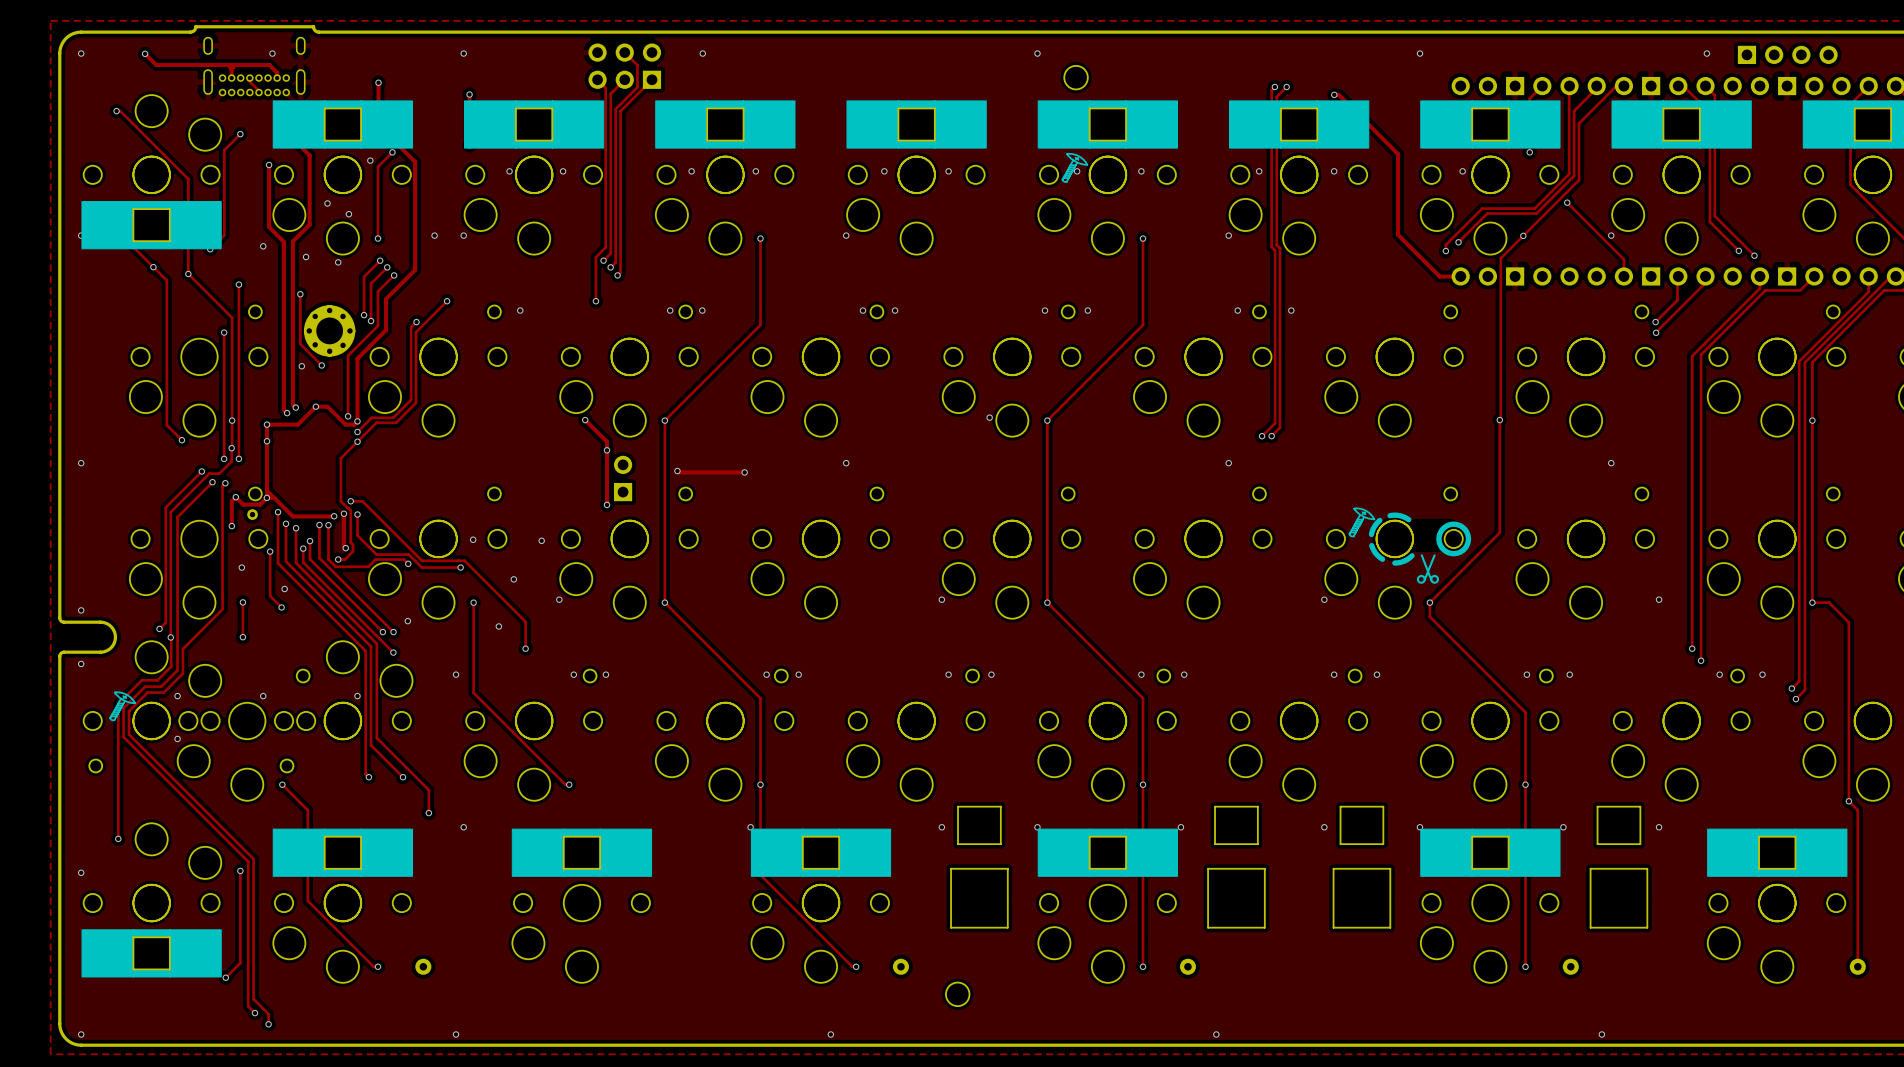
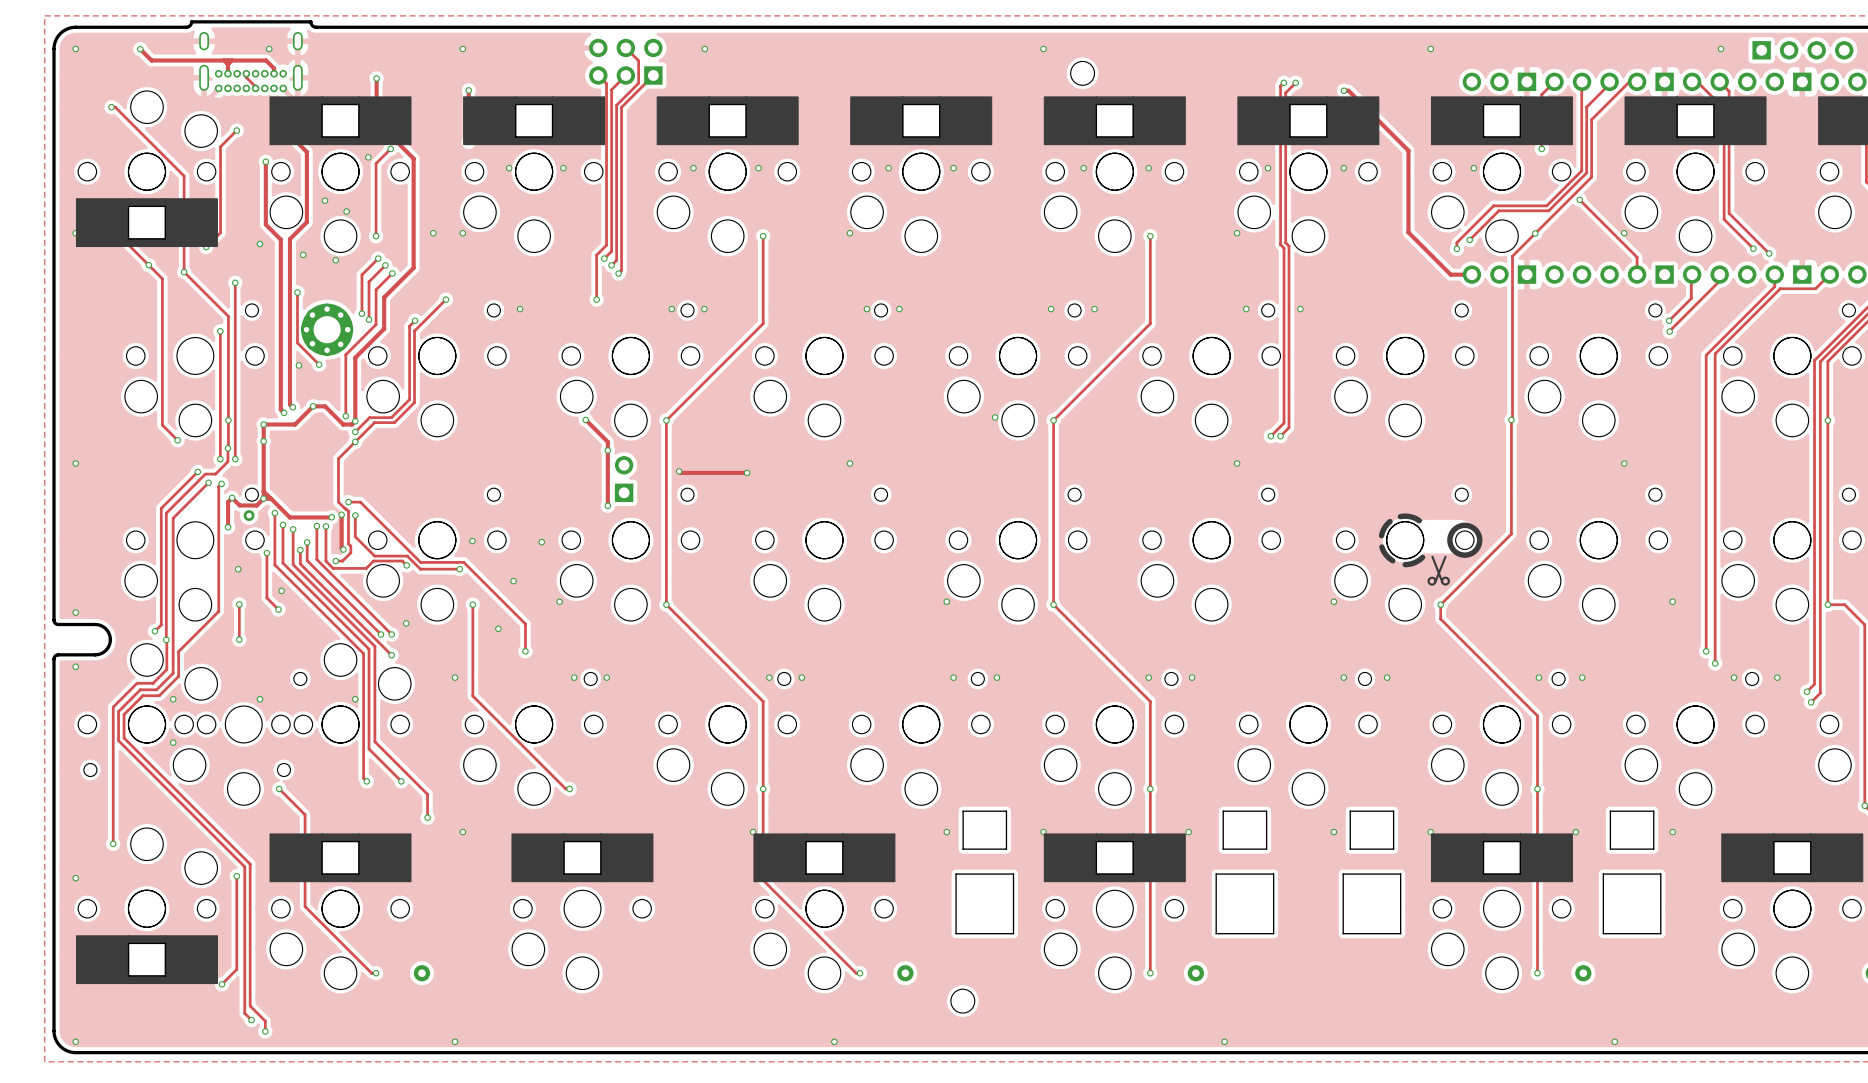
drawing: [1061, 153, 1089, 183] -> none
drawing: [1348, 507, 1376, 538] -> none
drawing: [109, 691, 136, 722] -> none

